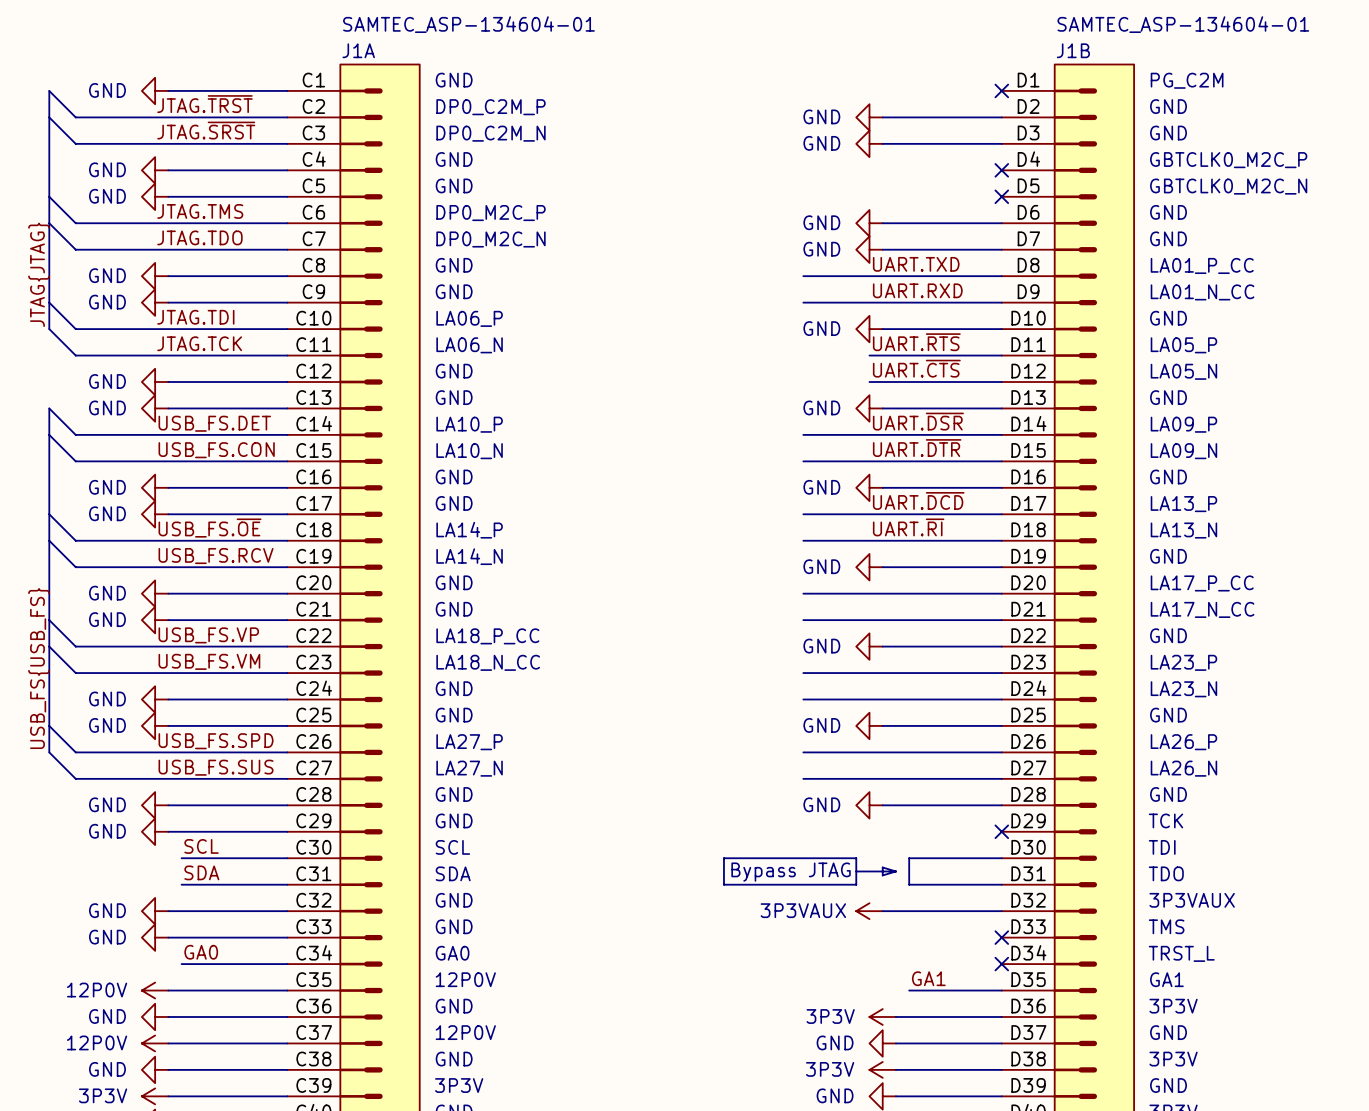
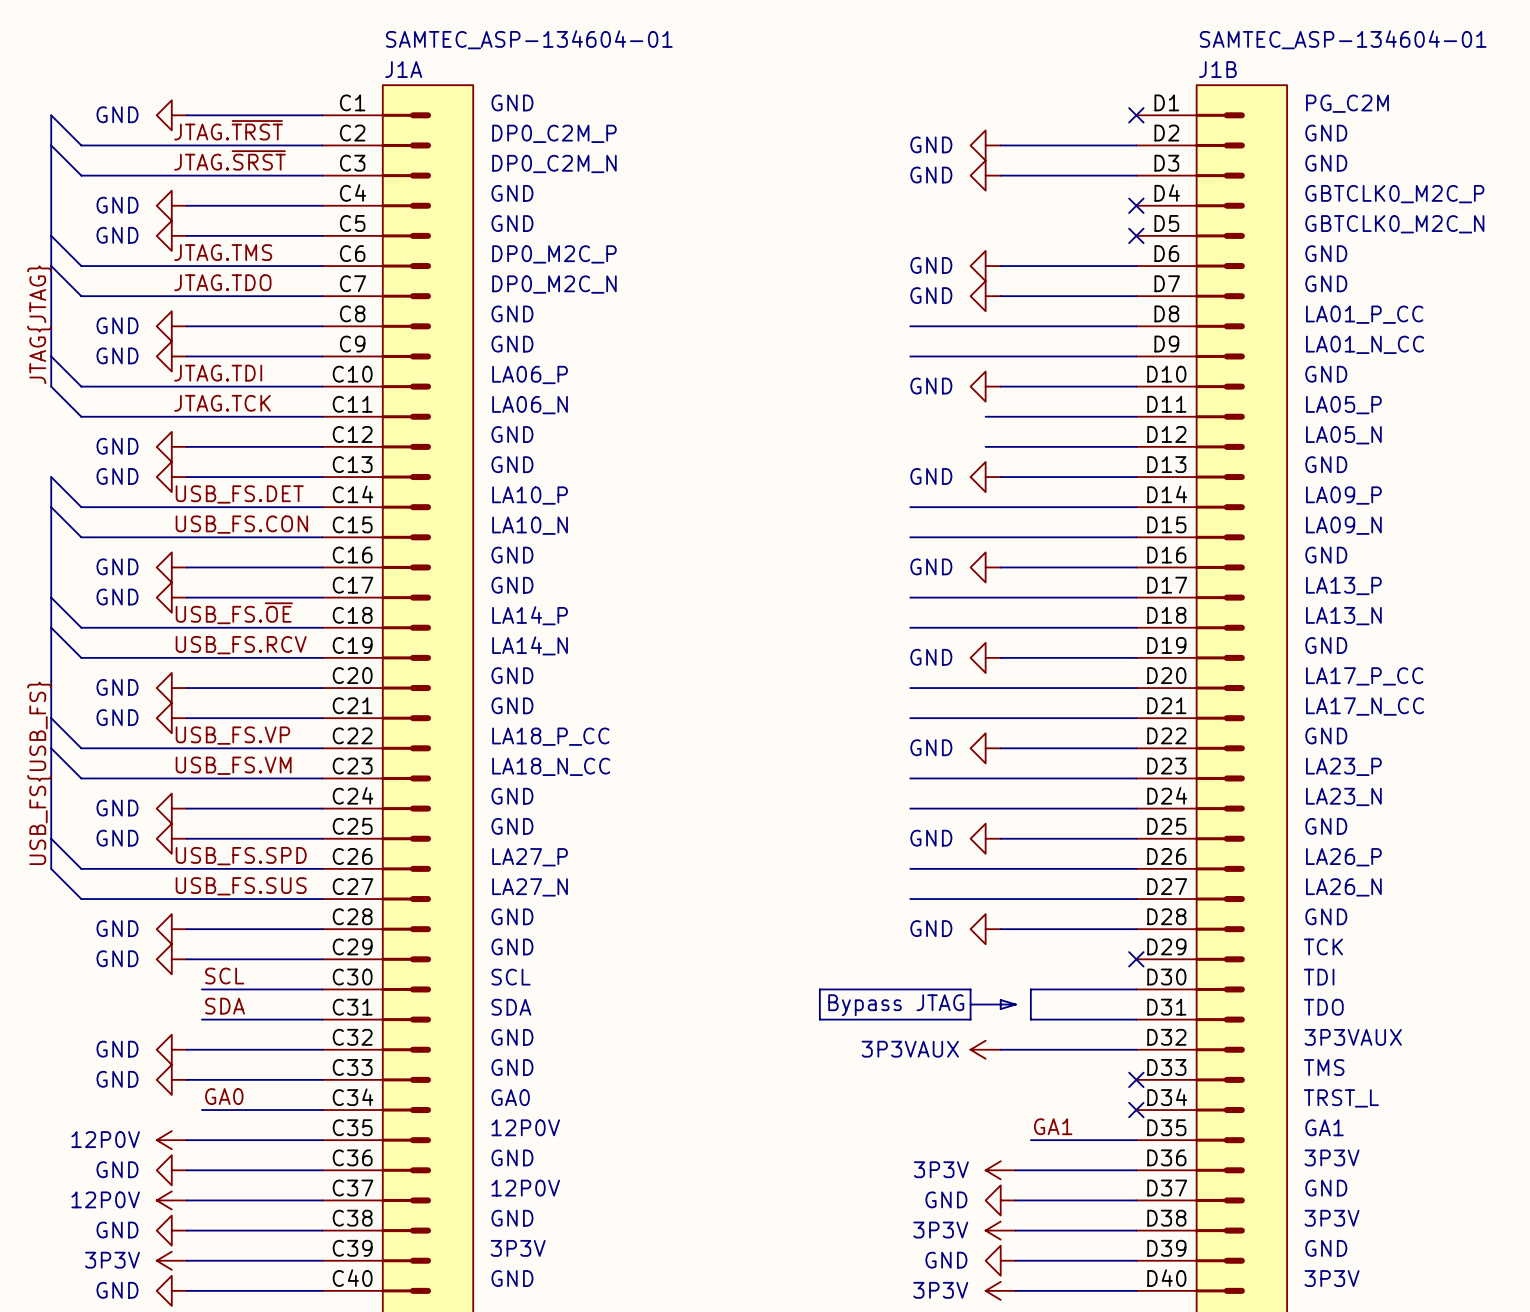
label: UART.TXD (916, 264) -> none
label: UART.RXD (917, 290) -> none
label: UART.~{RTS} (916, 342) -> none
label: UART.~{CTS} (916, 368) -> none
label: UART.~{DSR} (918, 421) -> none
label: UART.~{DTR} (917, 448) -> none
label: UART.~{DCD} (918, 500) -> none
label: UART.~{RI} (908, 527) -> none

